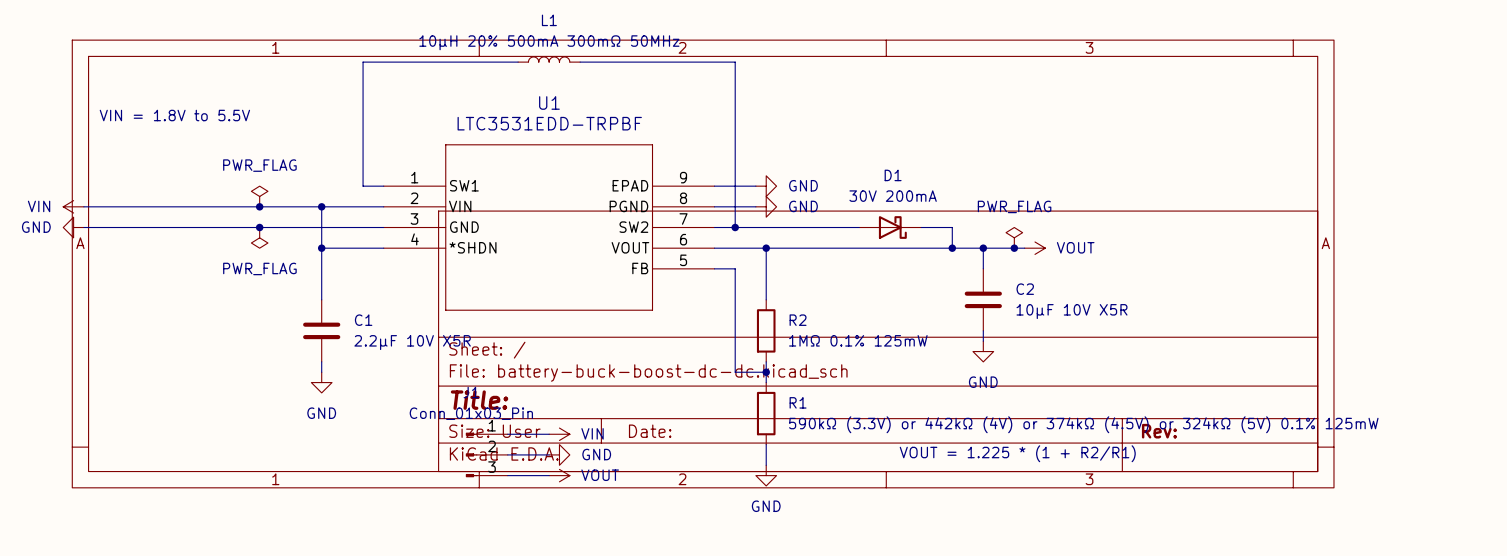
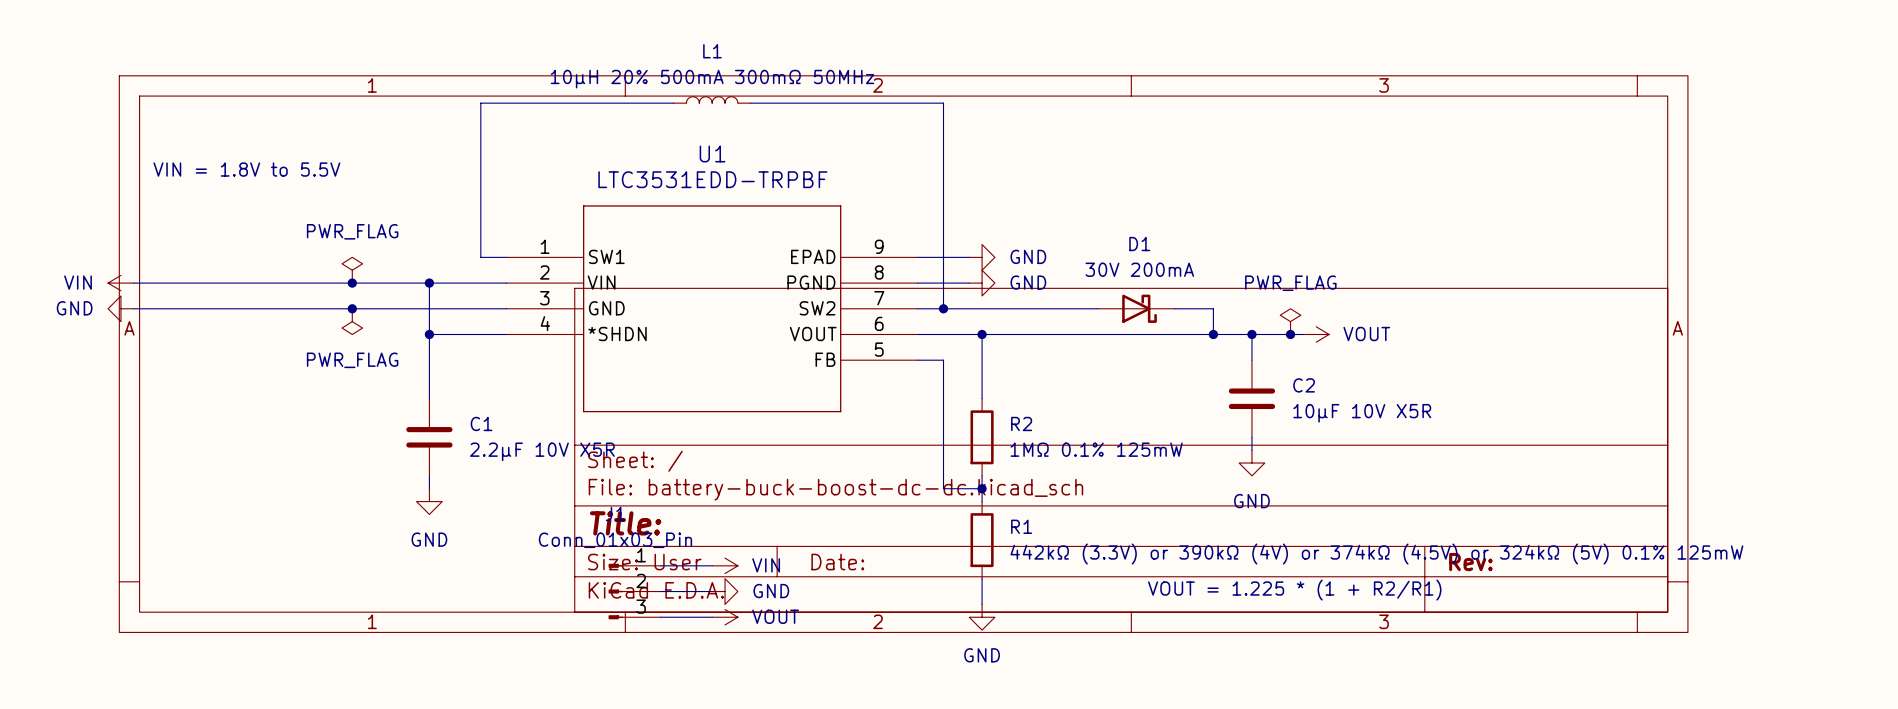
R1 value: 590kΩ (3.3V) or 442kΩ (4V) or 374kΩ (4.5V) or 324kΩ (5V) 0.1% 125mW (1083, 424) -> 442kΩ (3.3V) or 390kΩ (4V) or 374kΩ (4.5V) or 324kΩ (5V) 0.1% 125mW (1376, 554)

